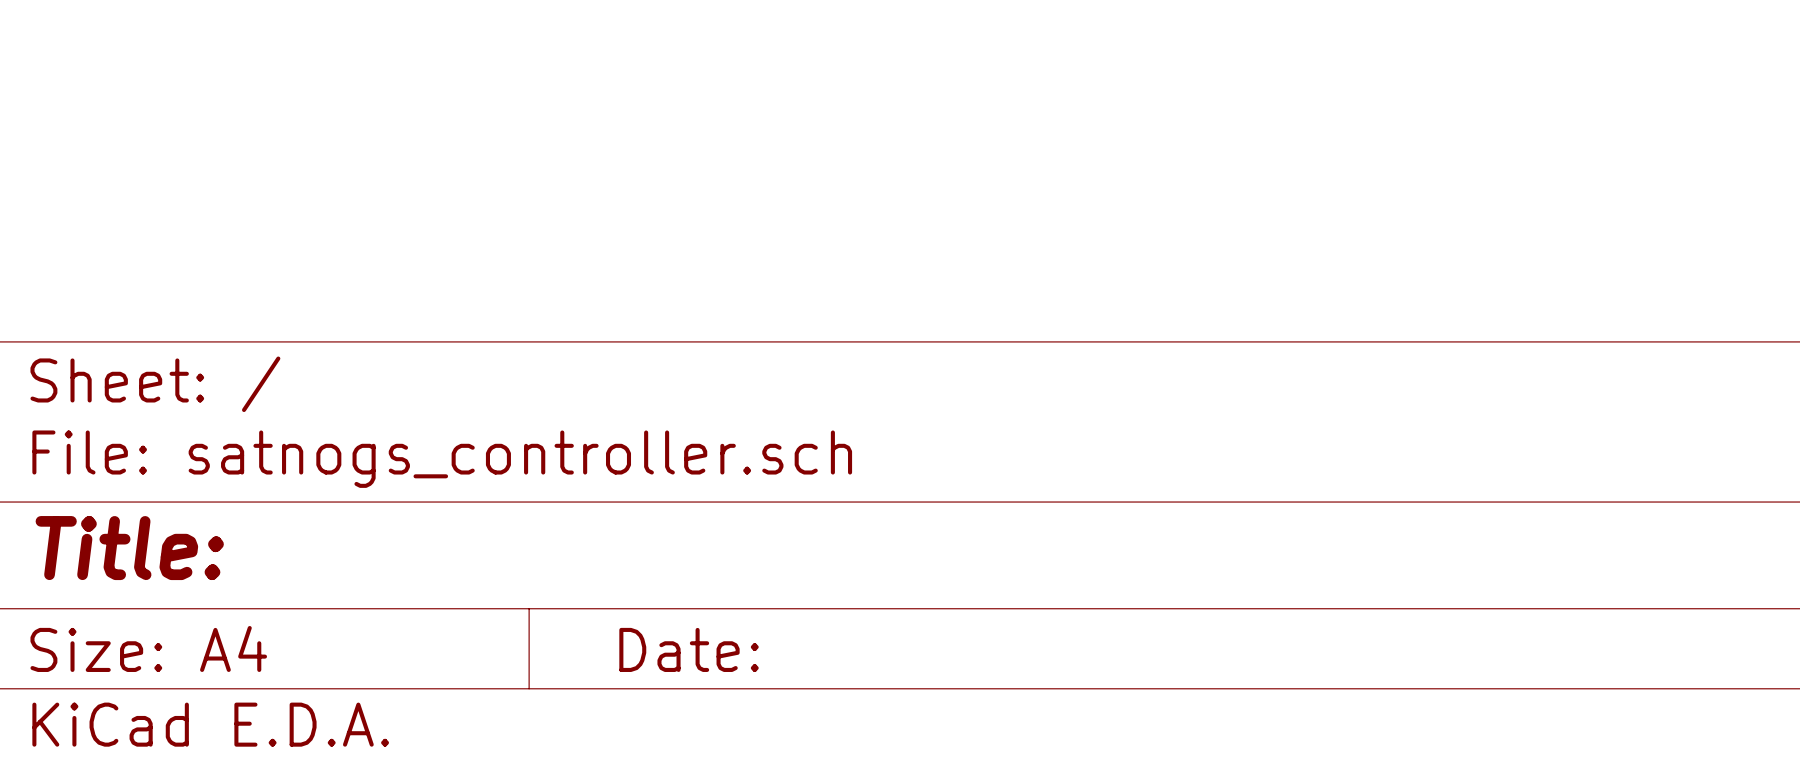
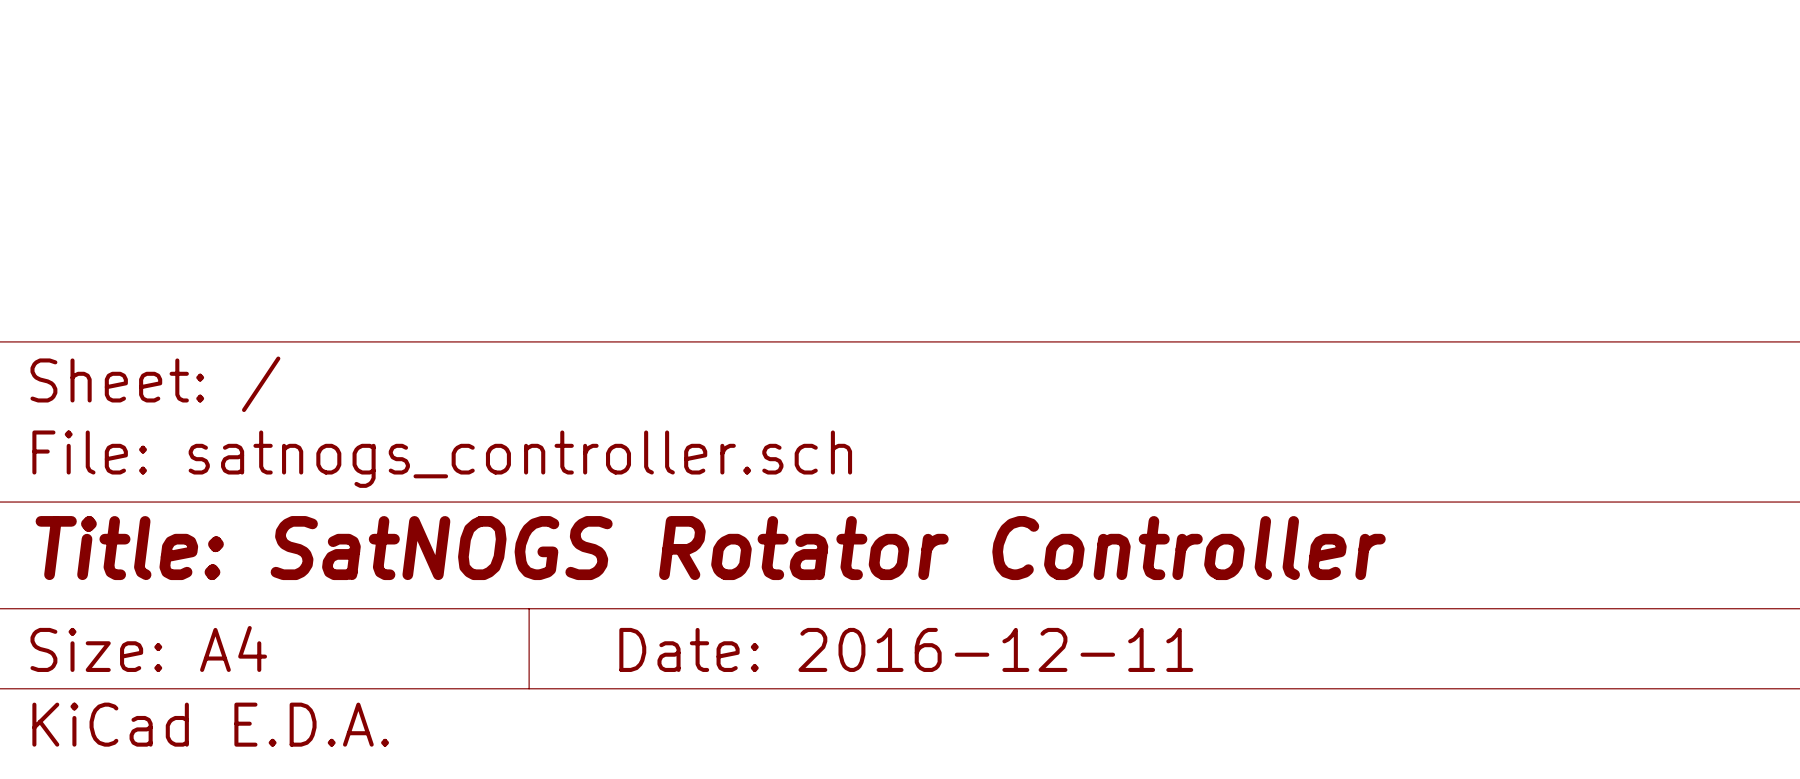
title block: Title: (129, 548) -> Title: SatNOGS Rotator Controller (710, 548)
title block: Date: (689, 649) -> Date: 2016-12-11 (906, 649)

